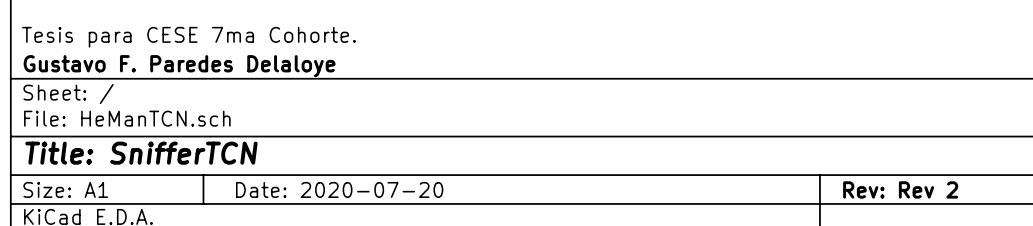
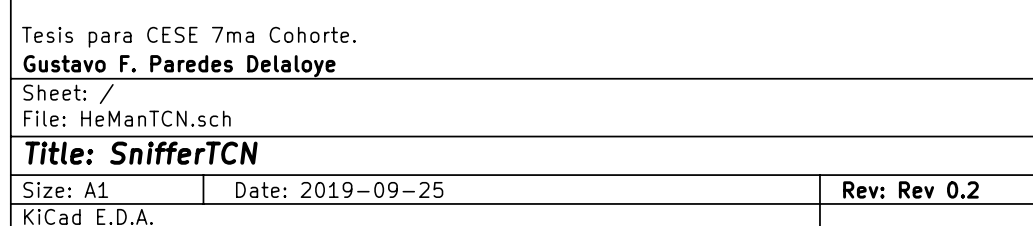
title block: Date: 2020-07-20 (339, 189) -> Date: 2019-09-25 (339, 189)
title block: Rev: Rev 2 (900, 189) -> Rev: Rev 0.2 (910, 189)

